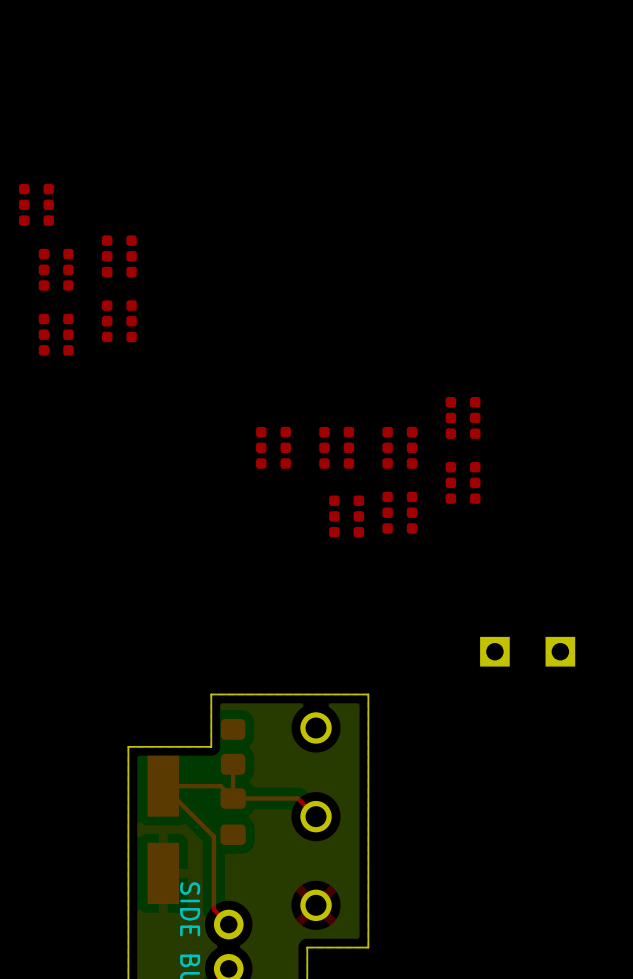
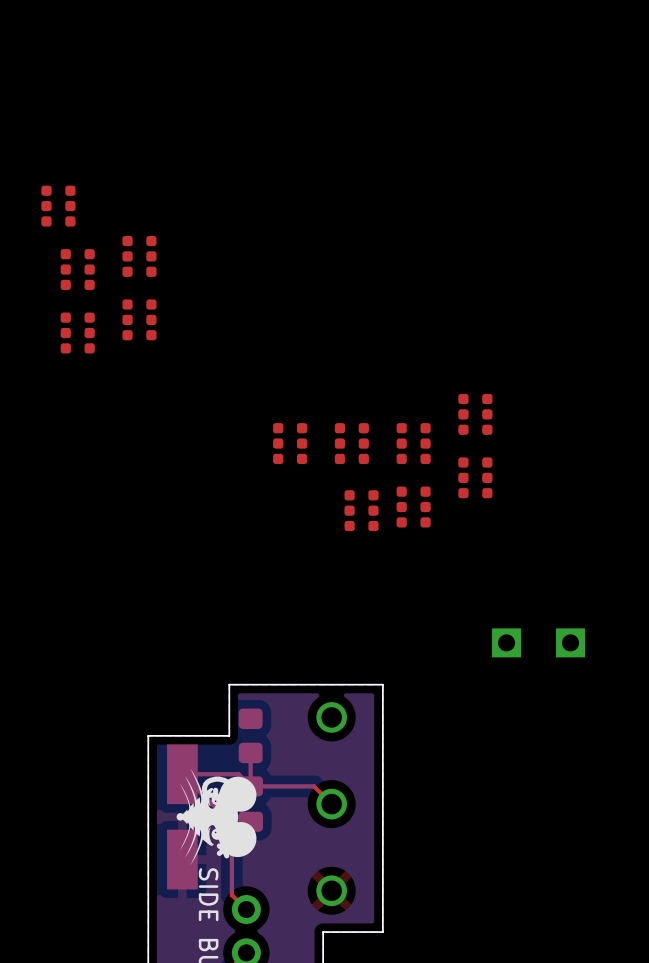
part: none -> (216, 816)

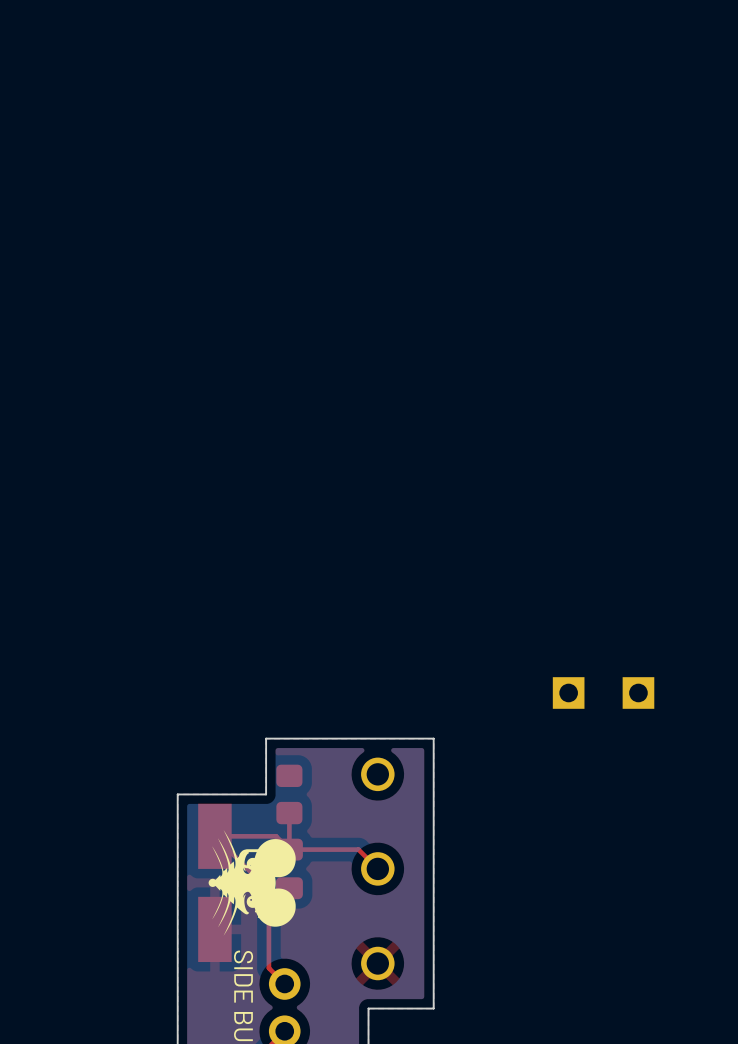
part: (58, 206) -> none
part: (139, 256) -> none
part: (77, 269) -> none
part: (139, 319) -> none
part: (77, 333) -> none
part: (475, 414) -> none
part: (290, 443) -> none
part: (351, 443) -> none
part: (413, 443) -> none
part: (475, 477) -> none
part: (413, 507) -> none
part: (361, 510) -> none

